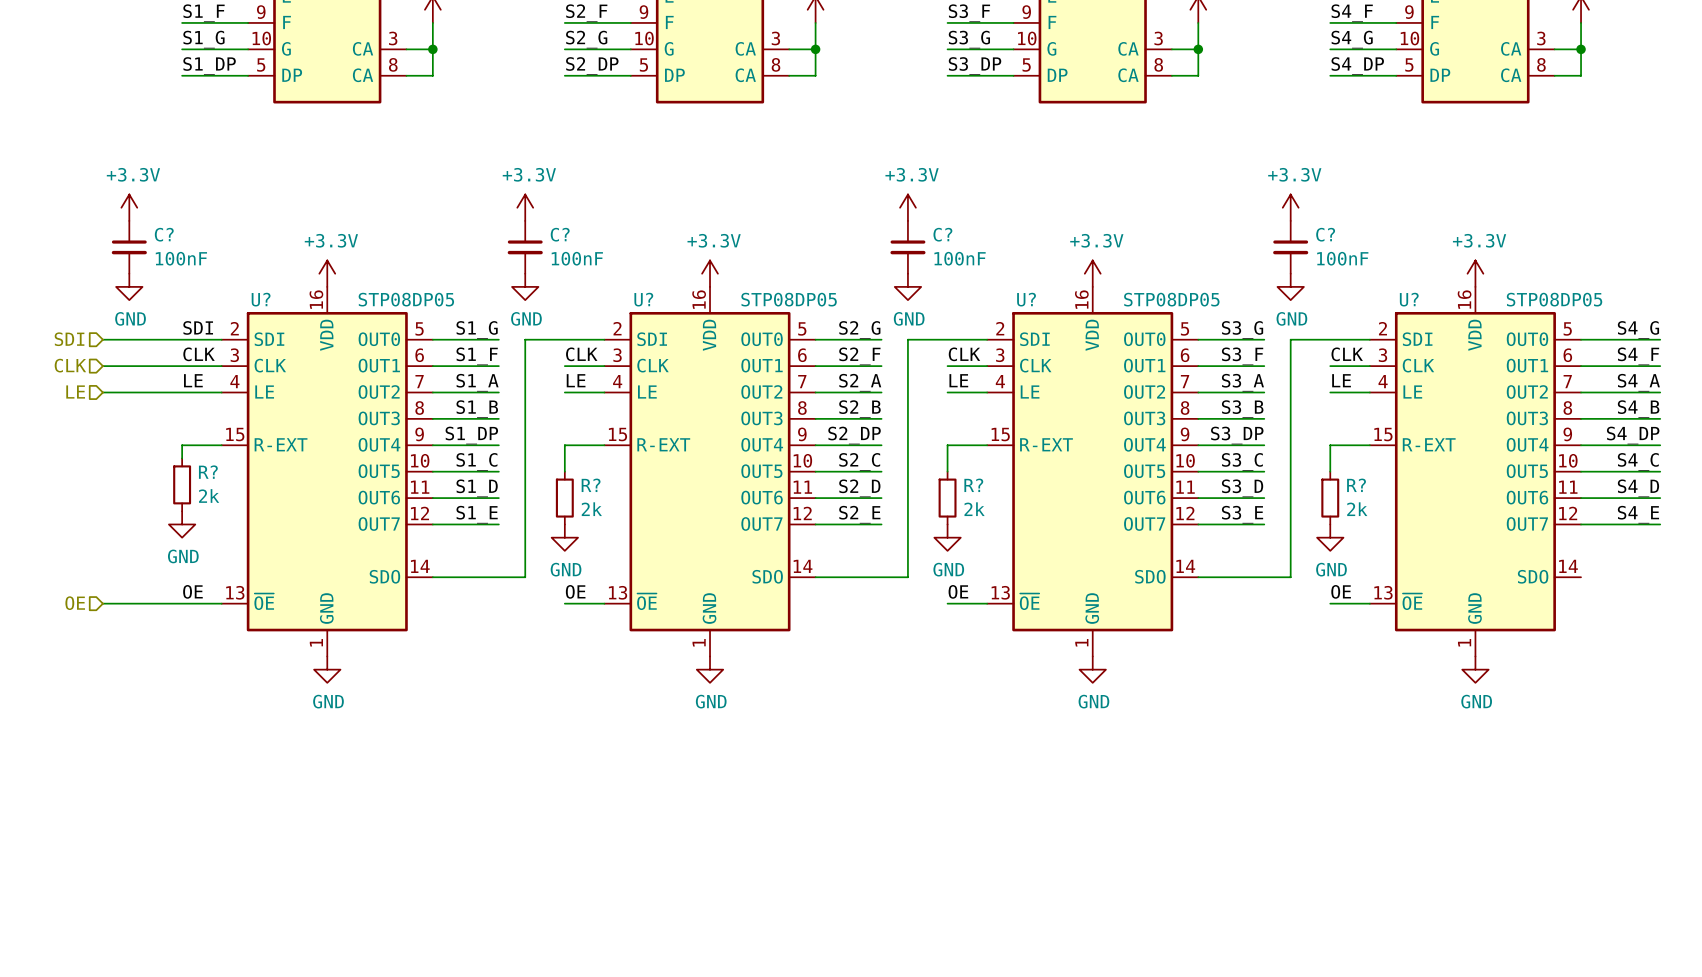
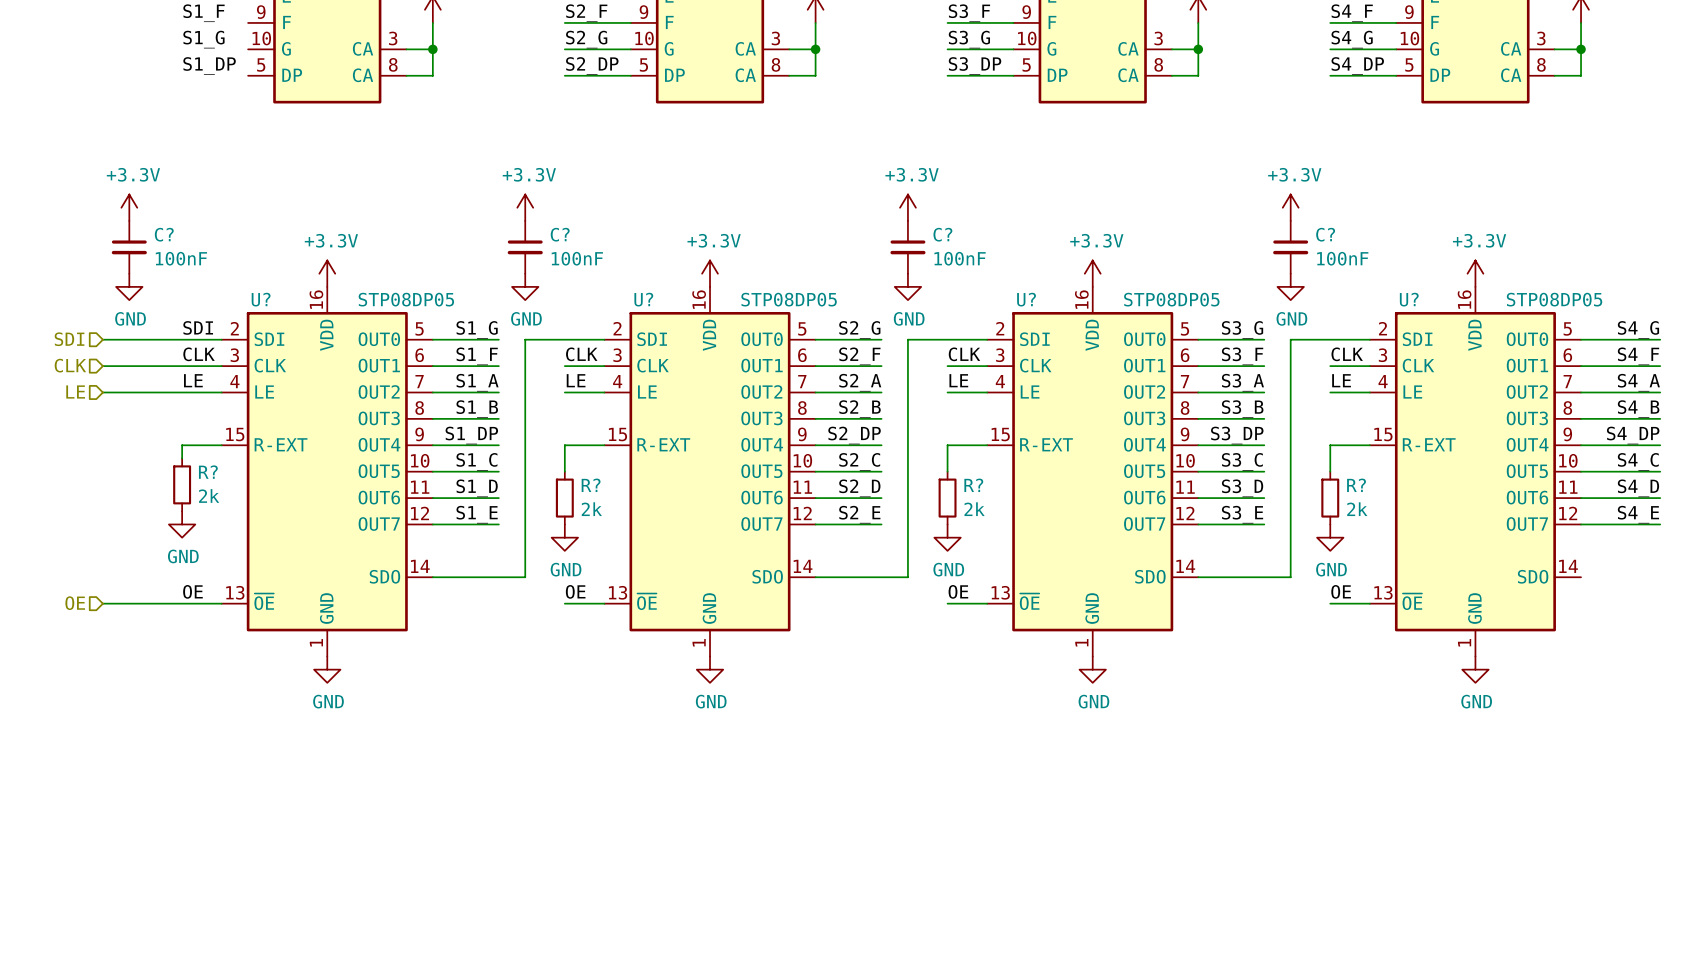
wire: (182, 22) (248, 22) -> none
wire: (182, 49) (248, 49) -> none
wire: (182, 75) (248, 75) -> none

